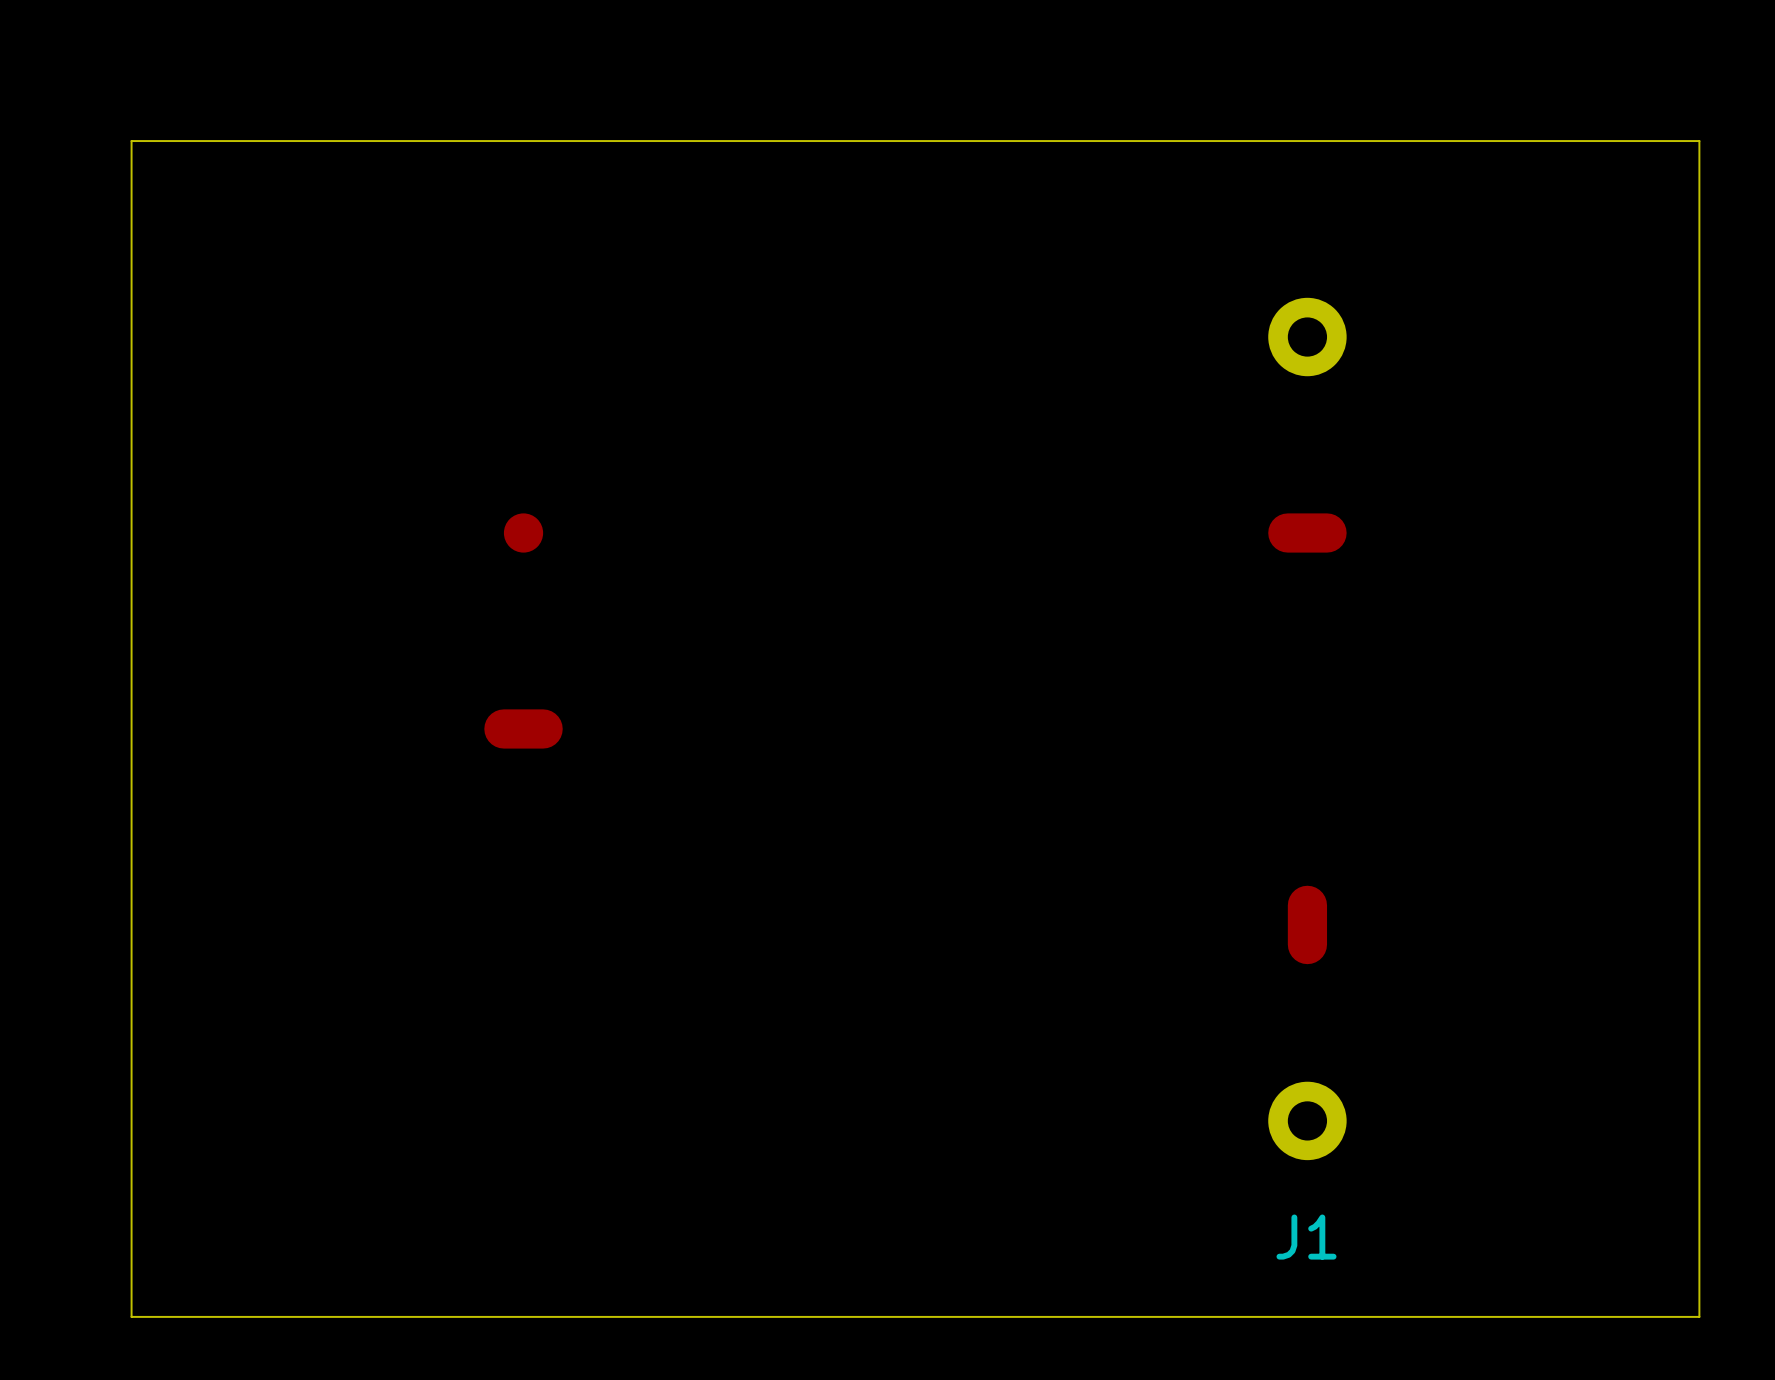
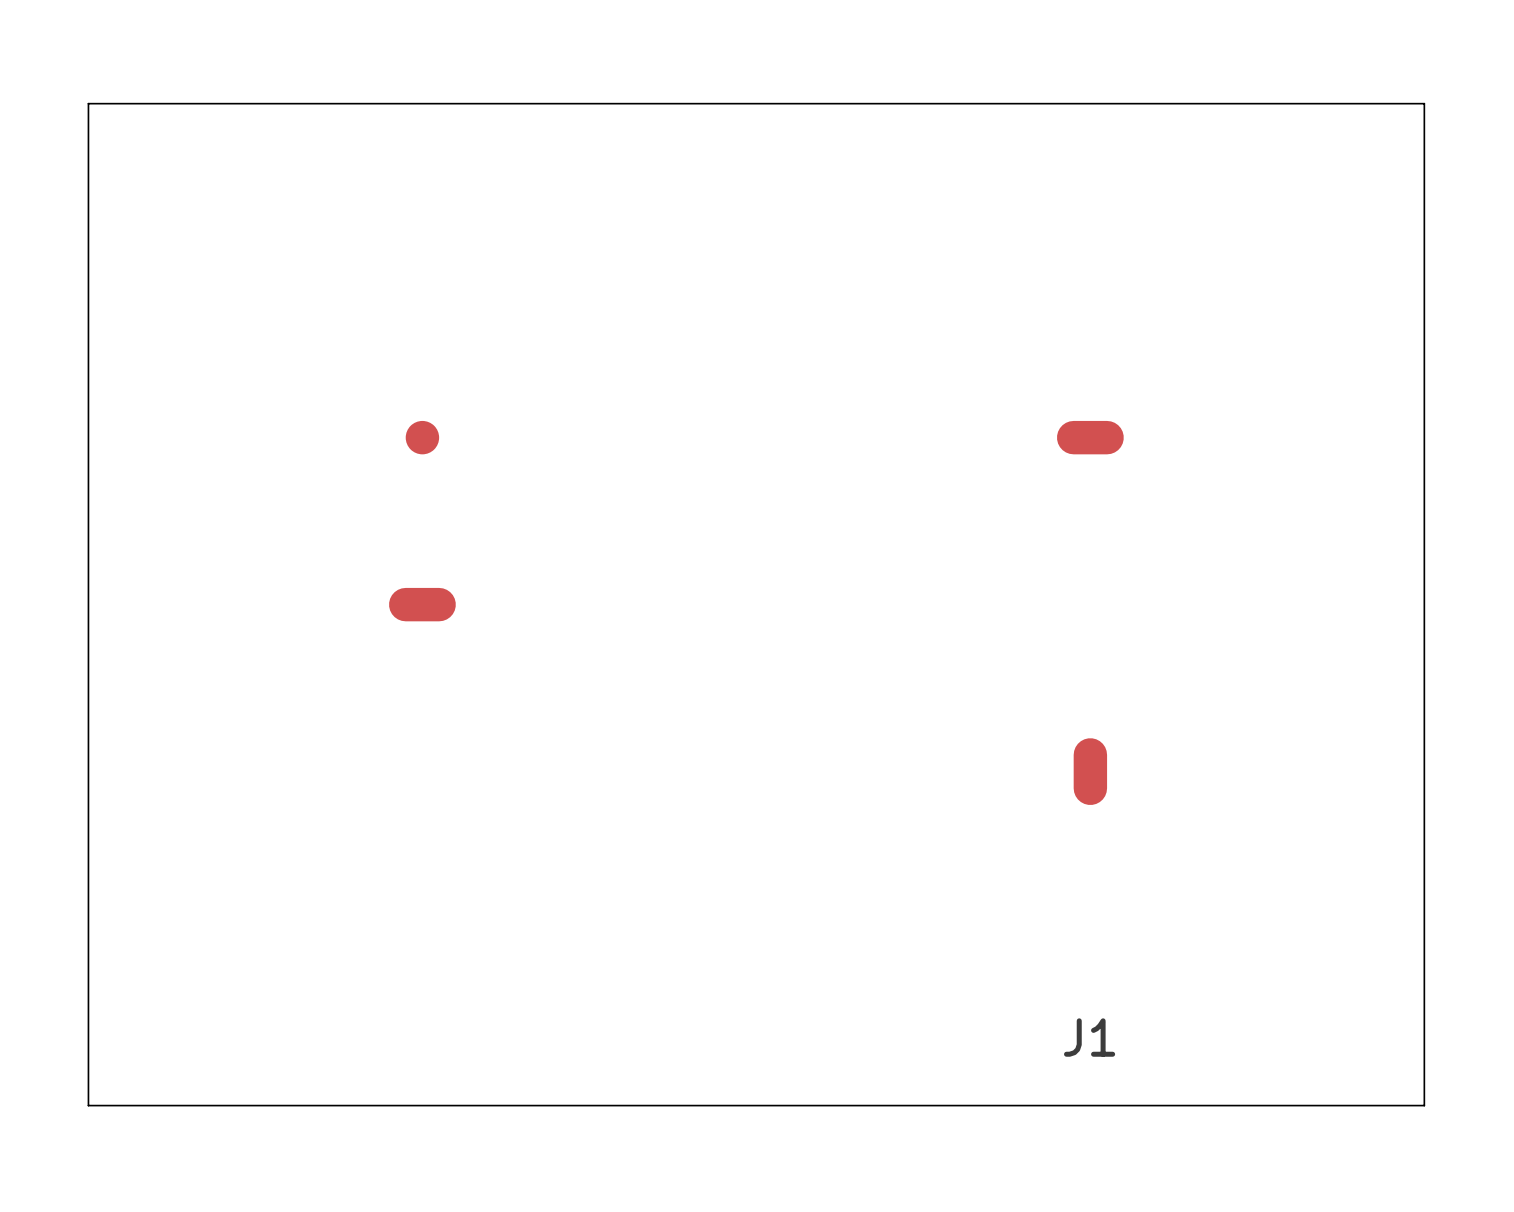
J1 footprint: [484, 297, 1347, 1161] -> [389, 420, 1124, 806]

